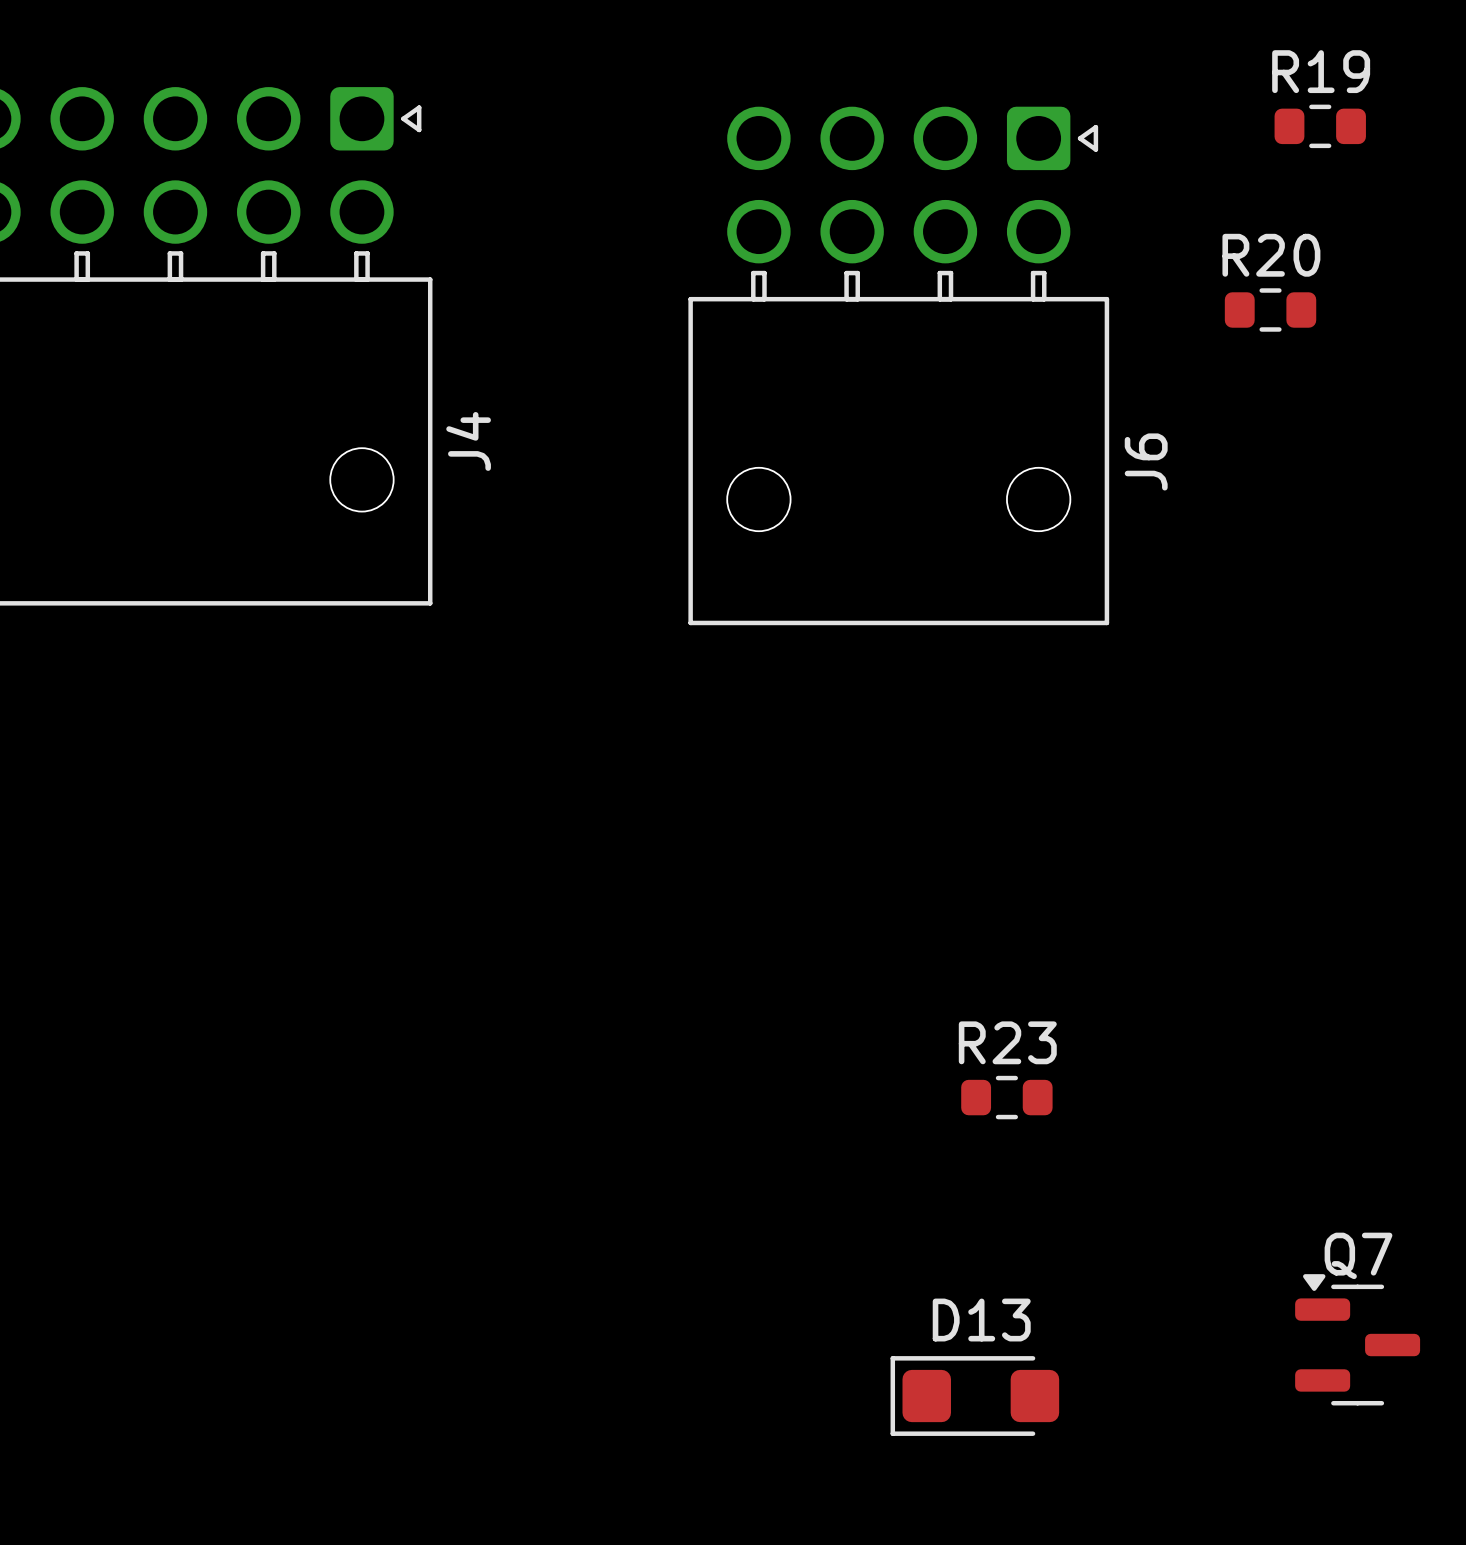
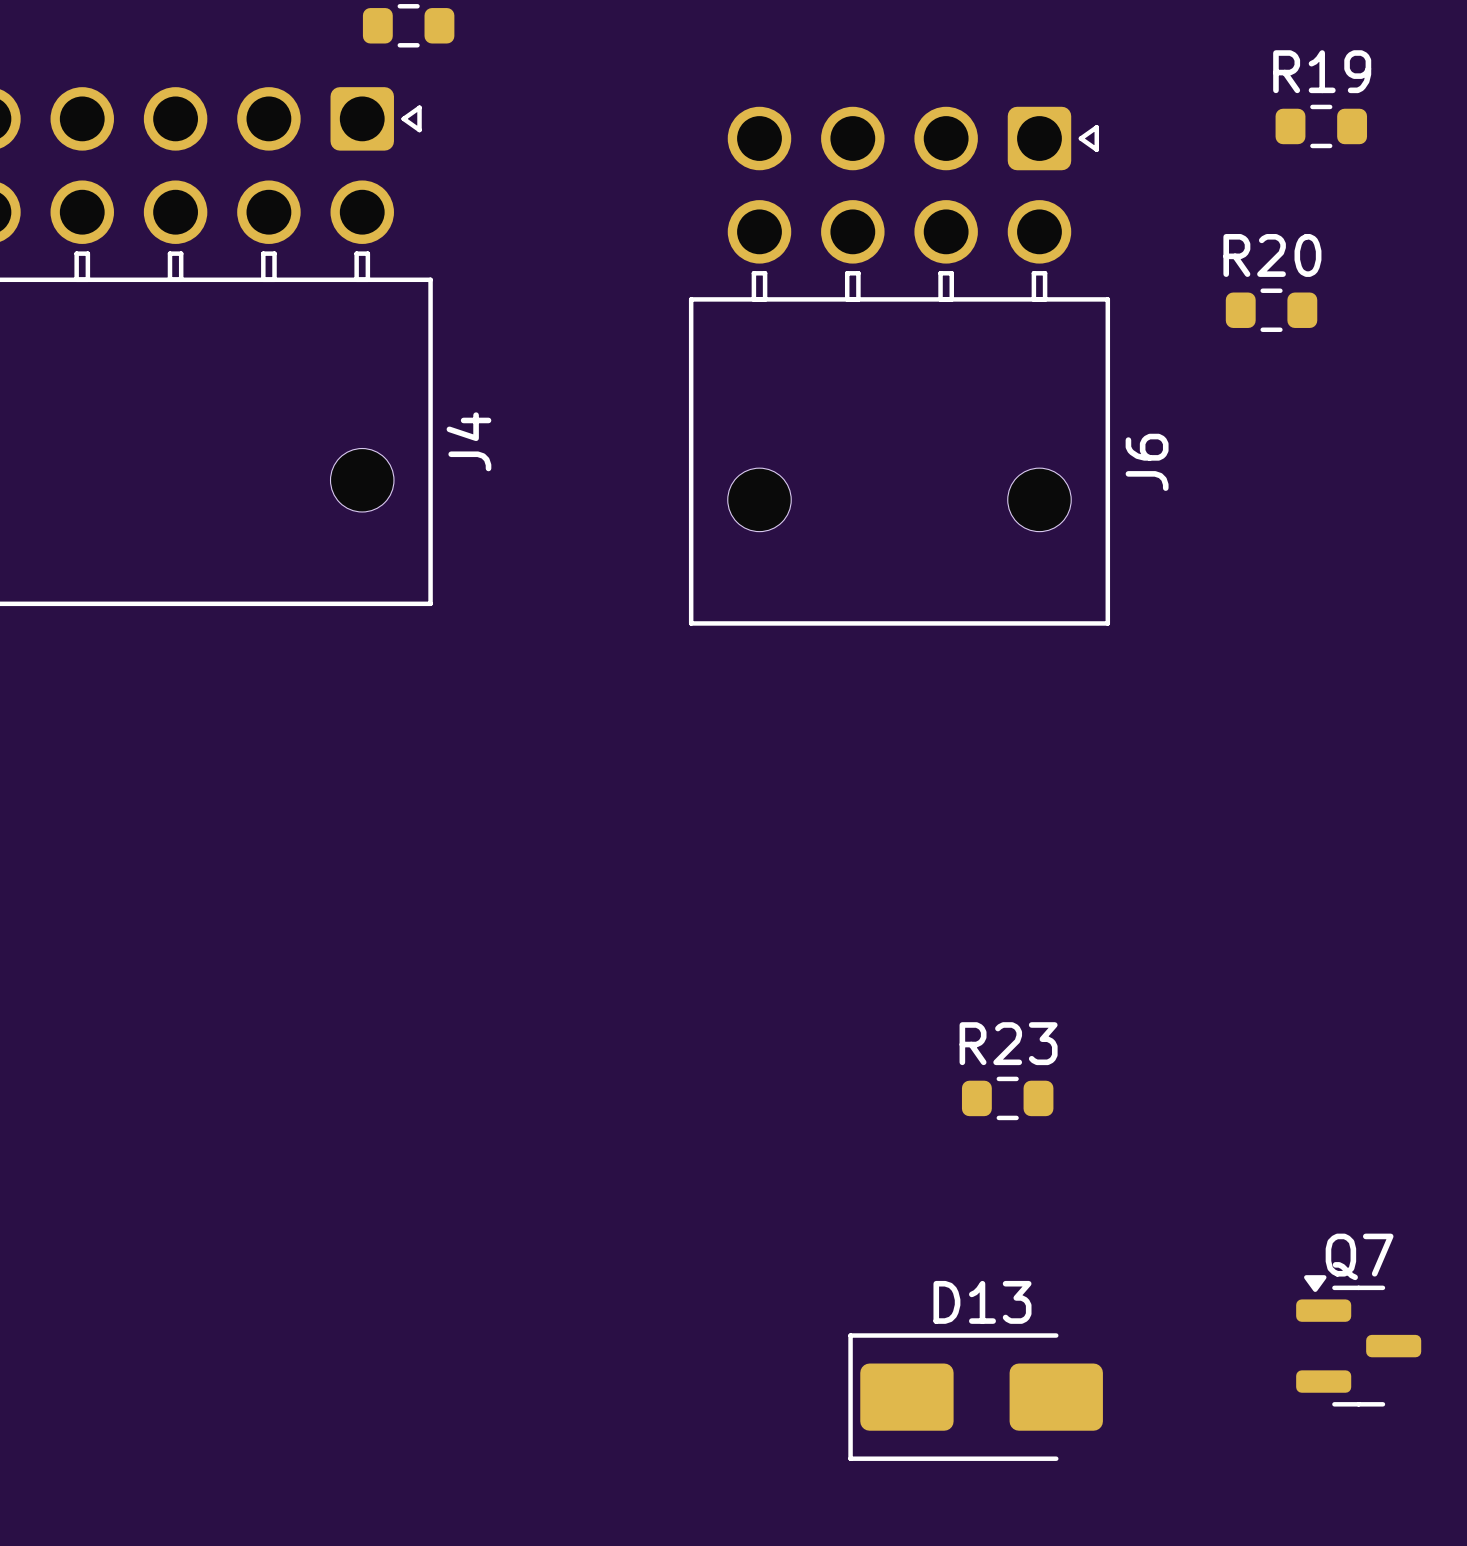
part: none -> (408, 25)
D13 footprint: [890, 1356, 1060, 1436] -> [848, 1333, 1103, 1461]

